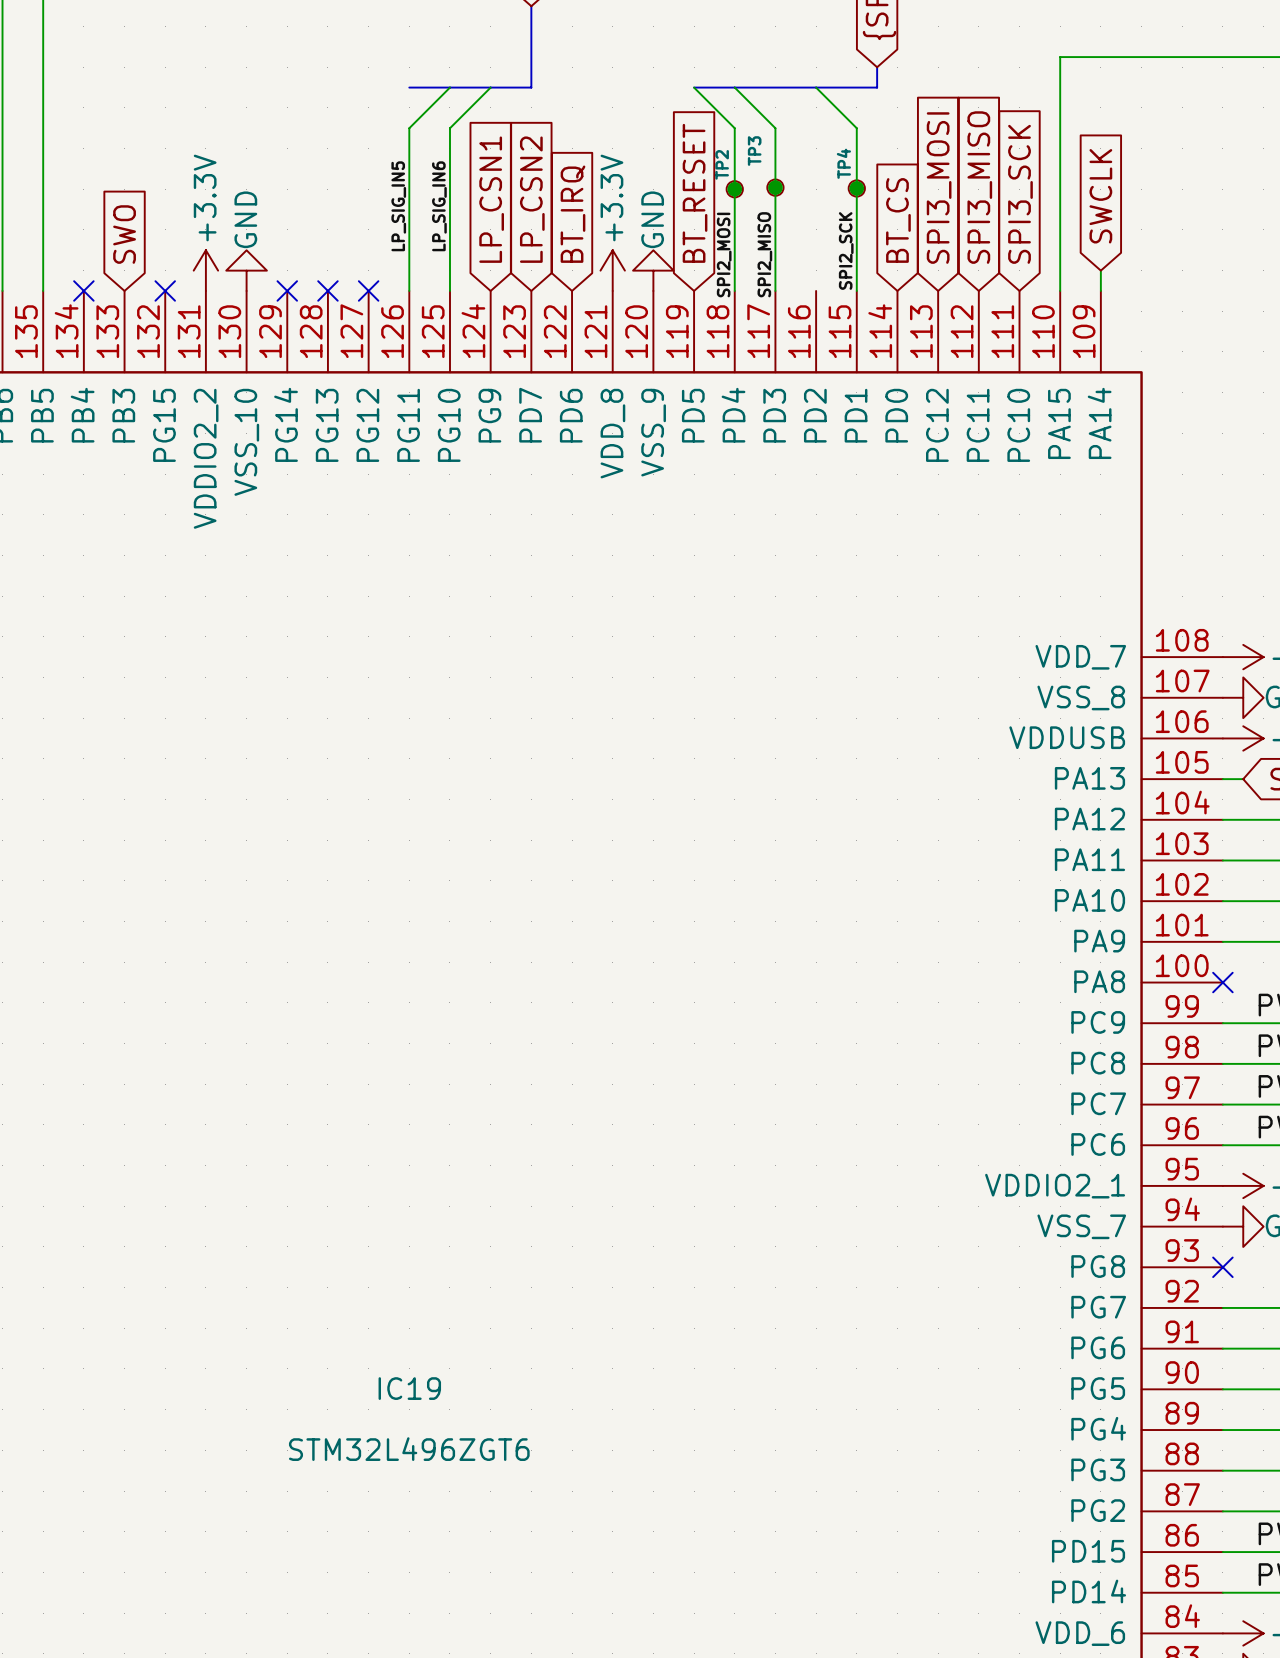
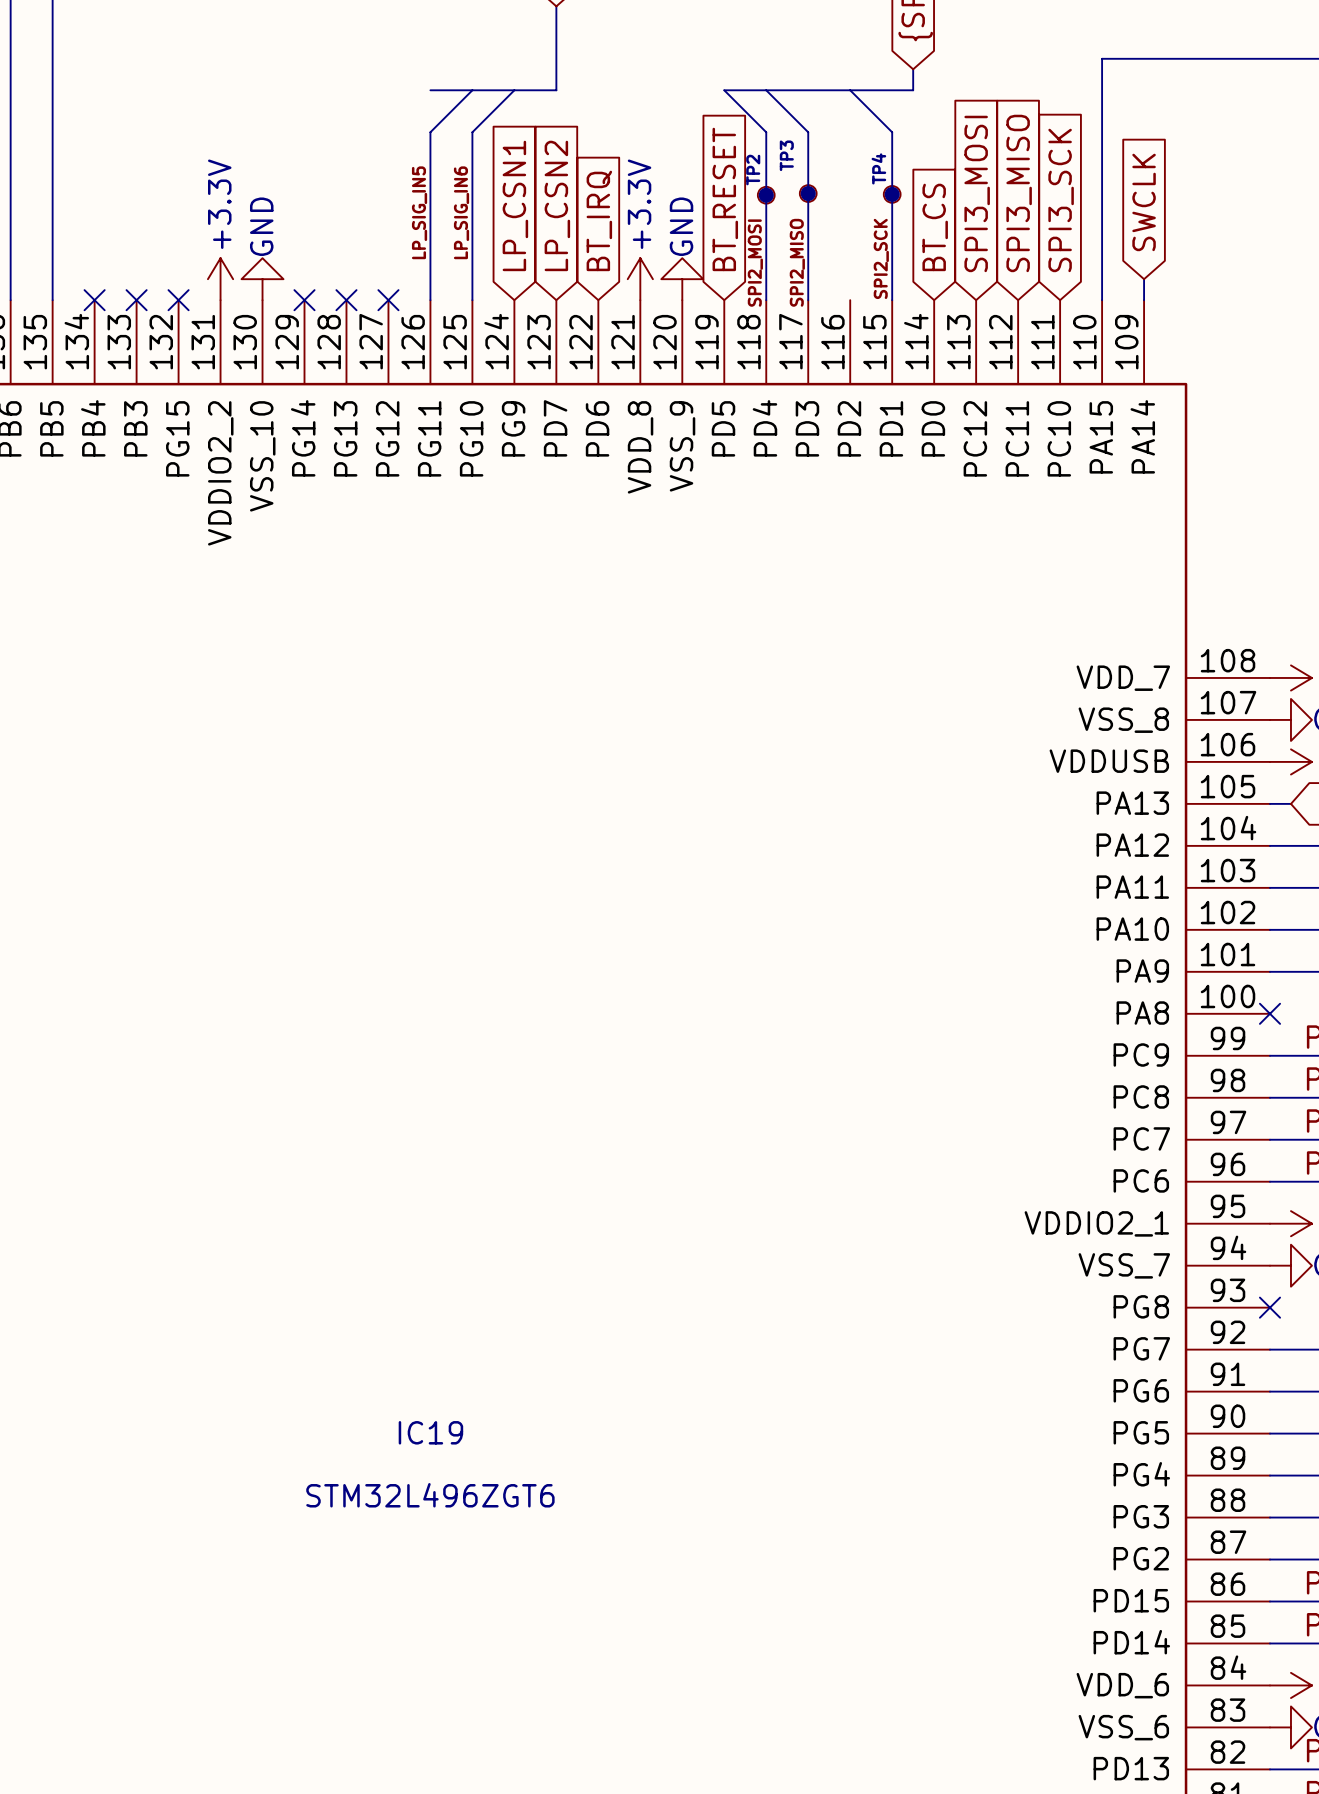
global label: SWO (124, 234) -> none
no-connect mark: none -> (136, 300)

